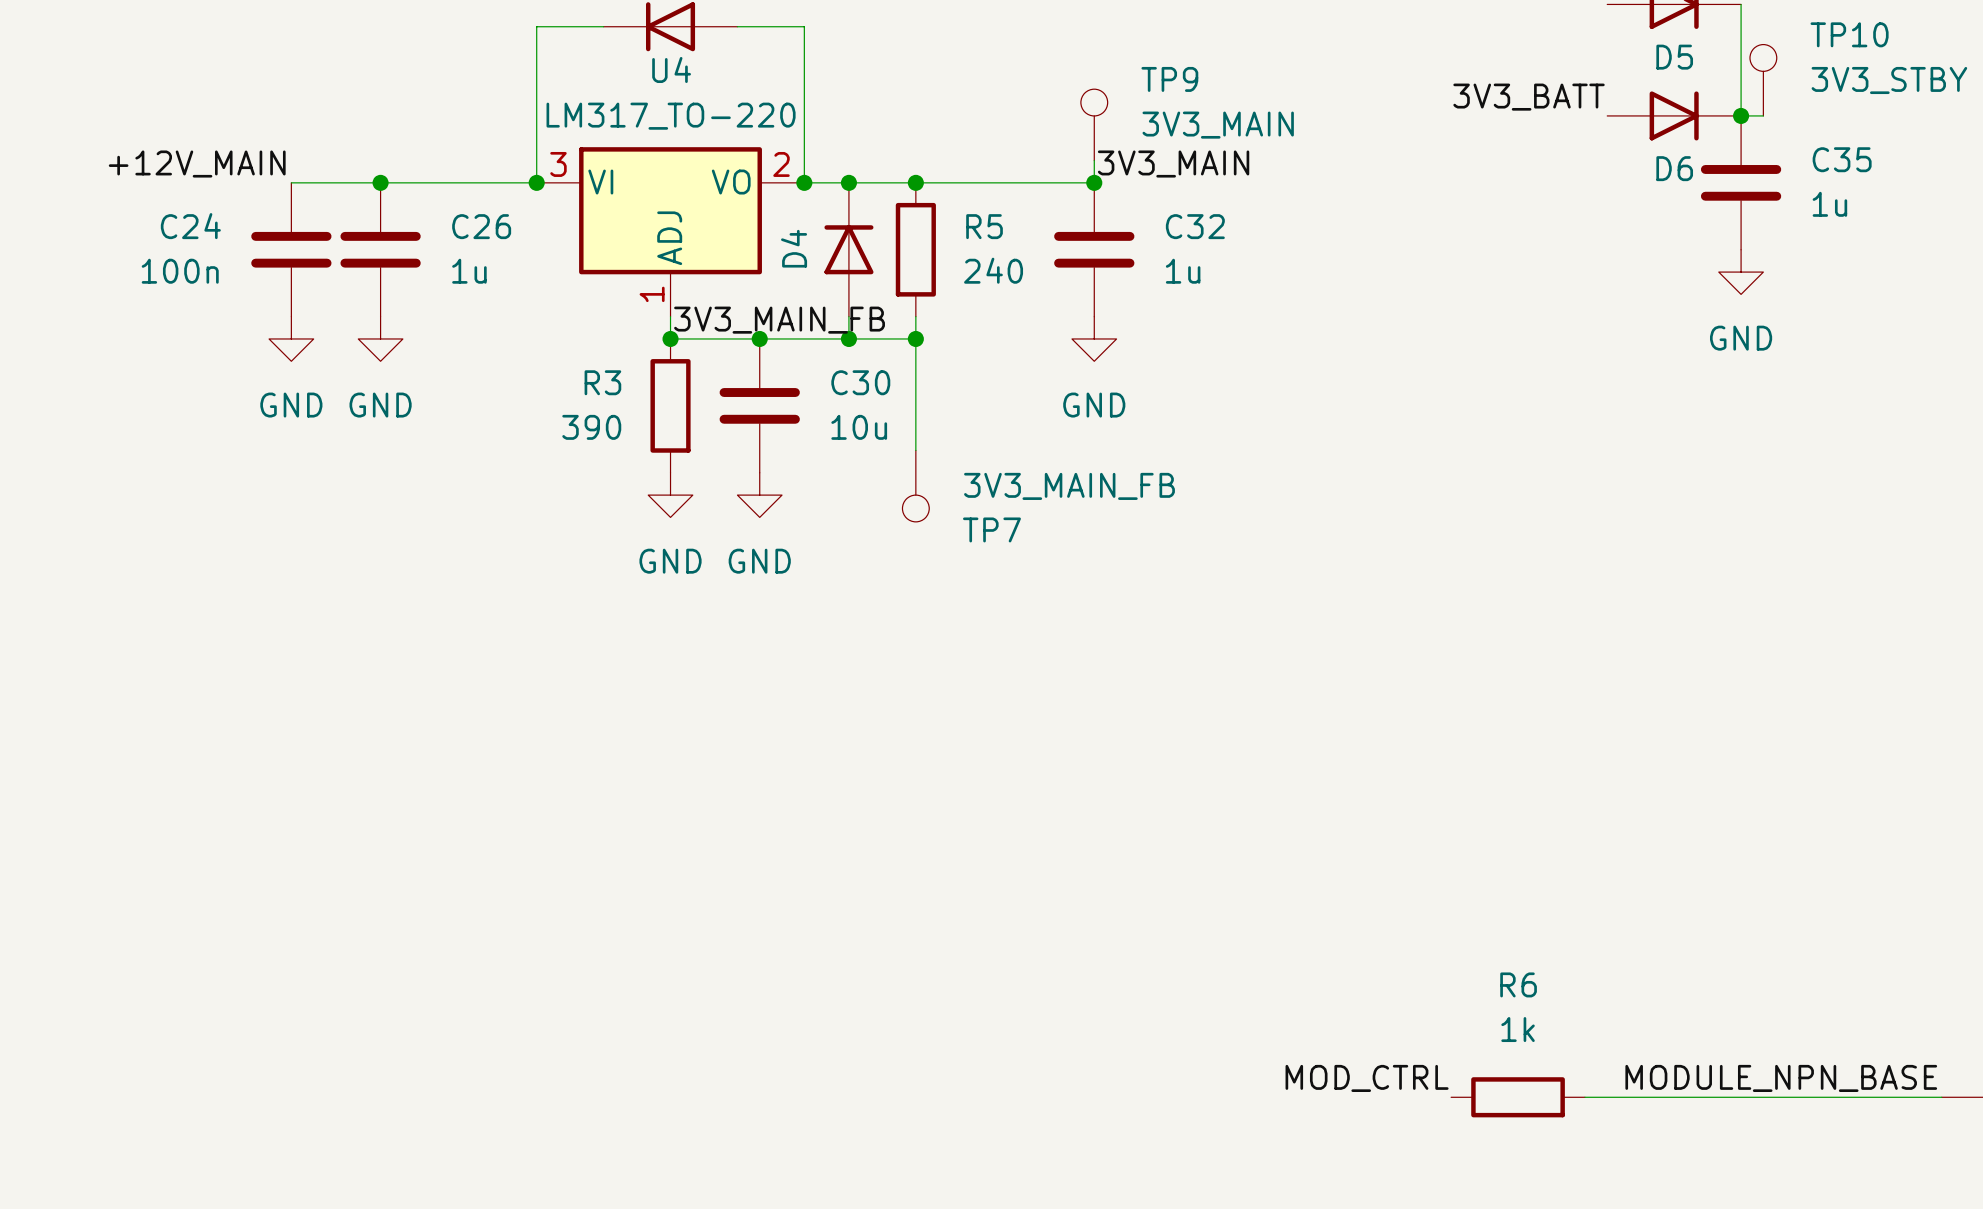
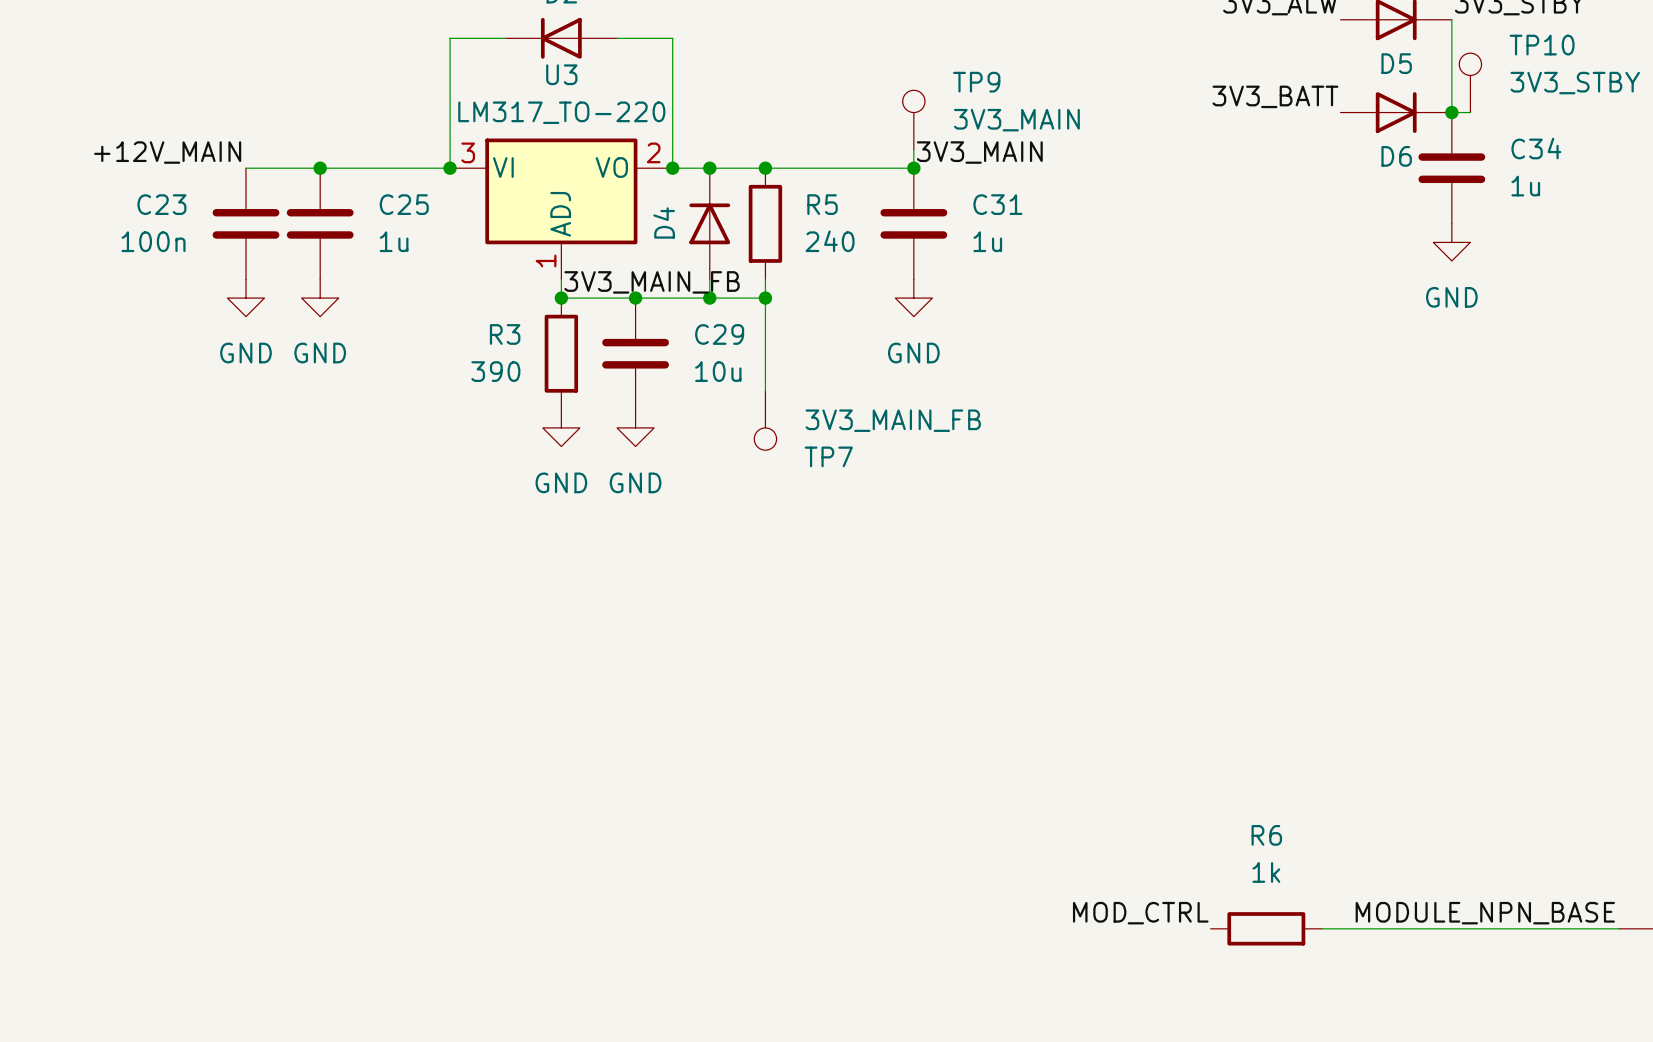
U4 name: U4 (671, 69) -> U3 (561, 74)
C35 name: C35 (1842, 159) -> C34 (1536, 148)
C24 name: C24 (190, 226) -> C23 (161, 204)
C26 name: C26 (481, 226) -> C25 (404, 204)
C32 name: C32 (1195, 226) -> C31 (997, 204)
C30 name: C30 (860, 382) -> C29 (719, 334)

